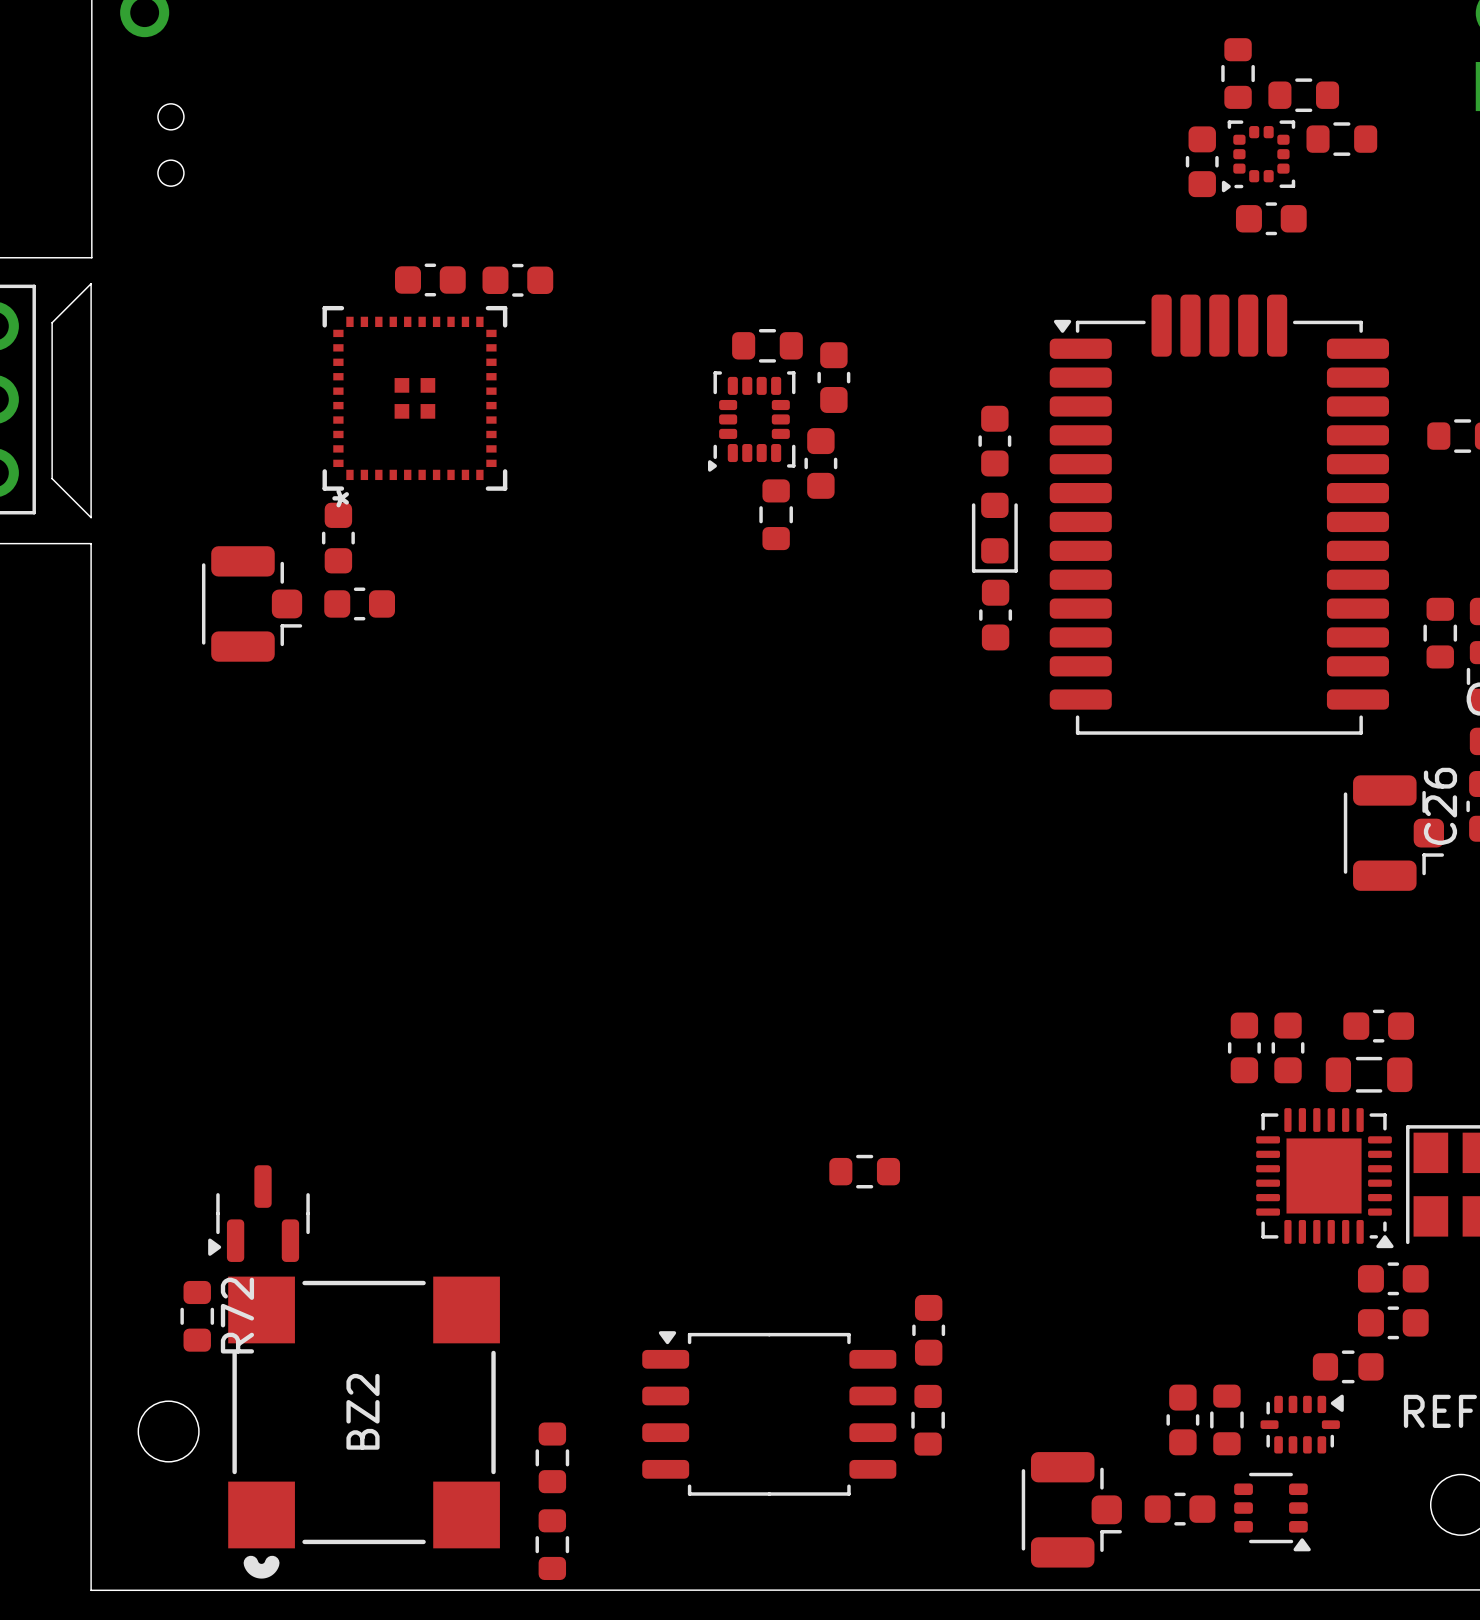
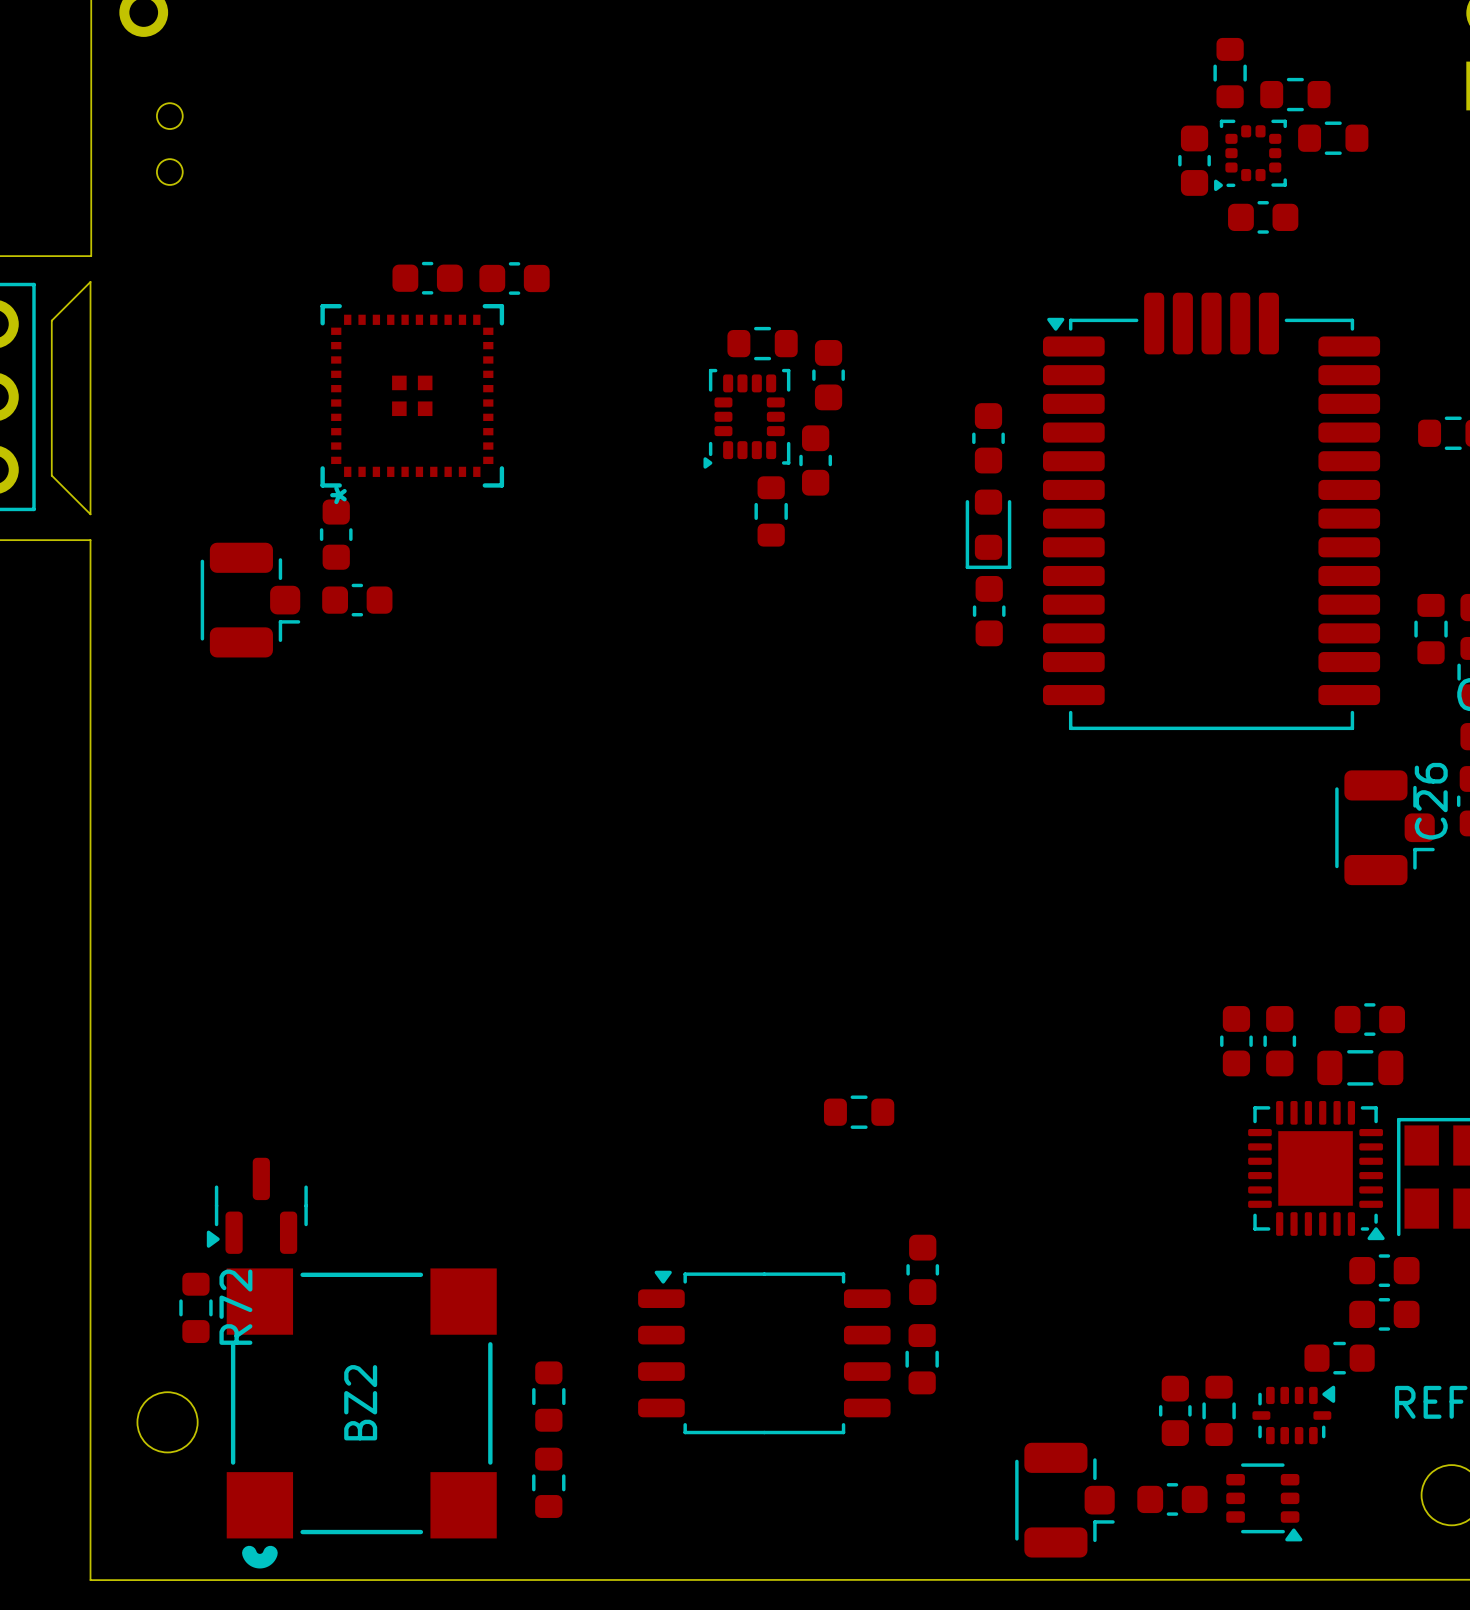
part position: (864, 1171) -> (859, 1112)
part position: (928, 1330) -> (922, 1269)
part: none -> (548, 1396)
part position: (769, 1413) -> (764, 1352)
part position: (928, 1420) -> (922, 1359)
part: (552, 1457) -> none
part: none -> (548, 1482)
part: (552, 1544) -> none

